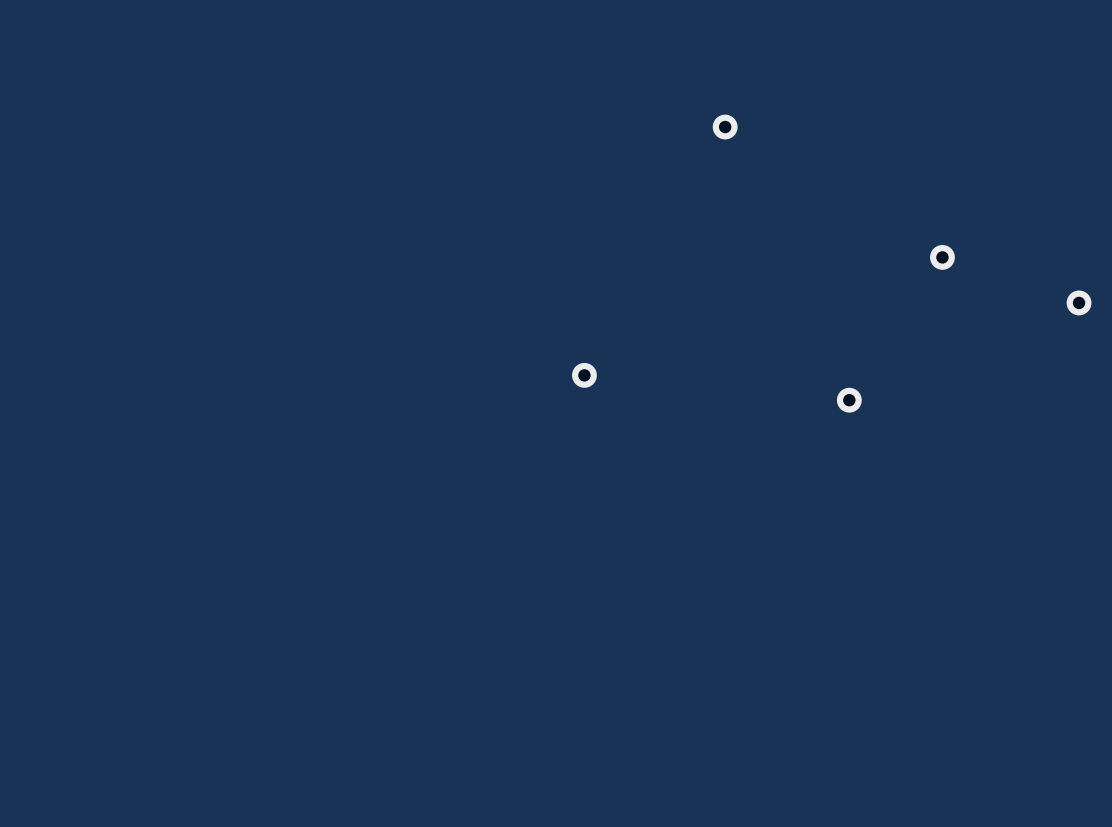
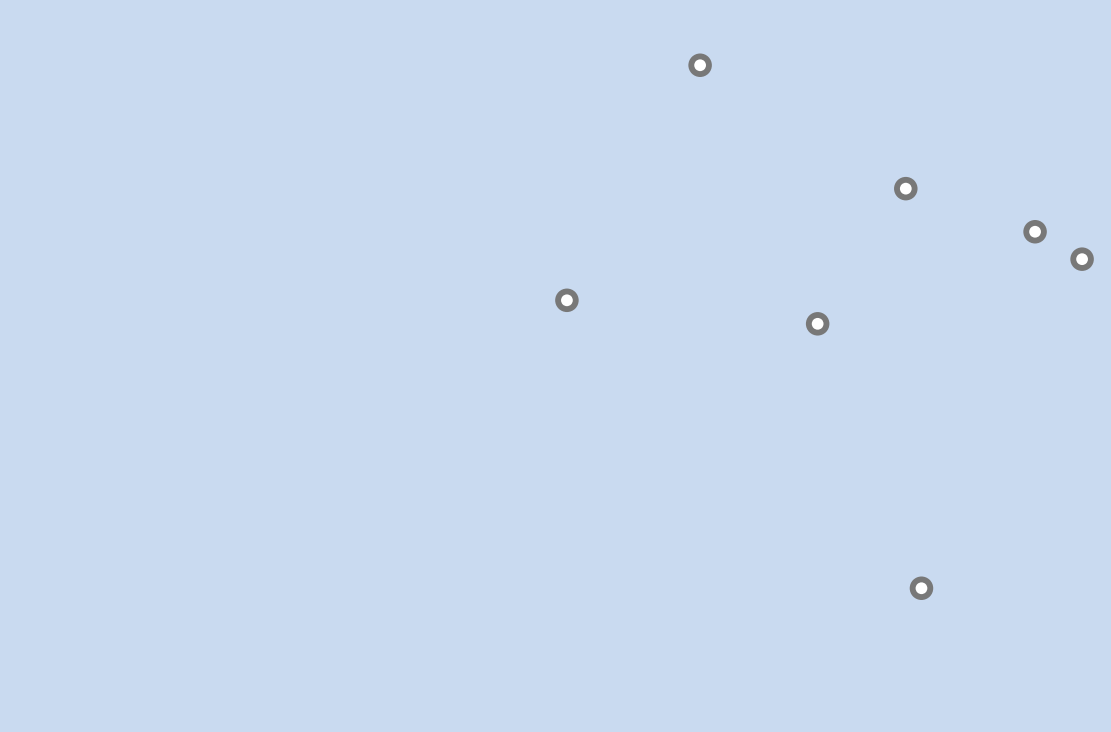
via: none -> (921, 588)

